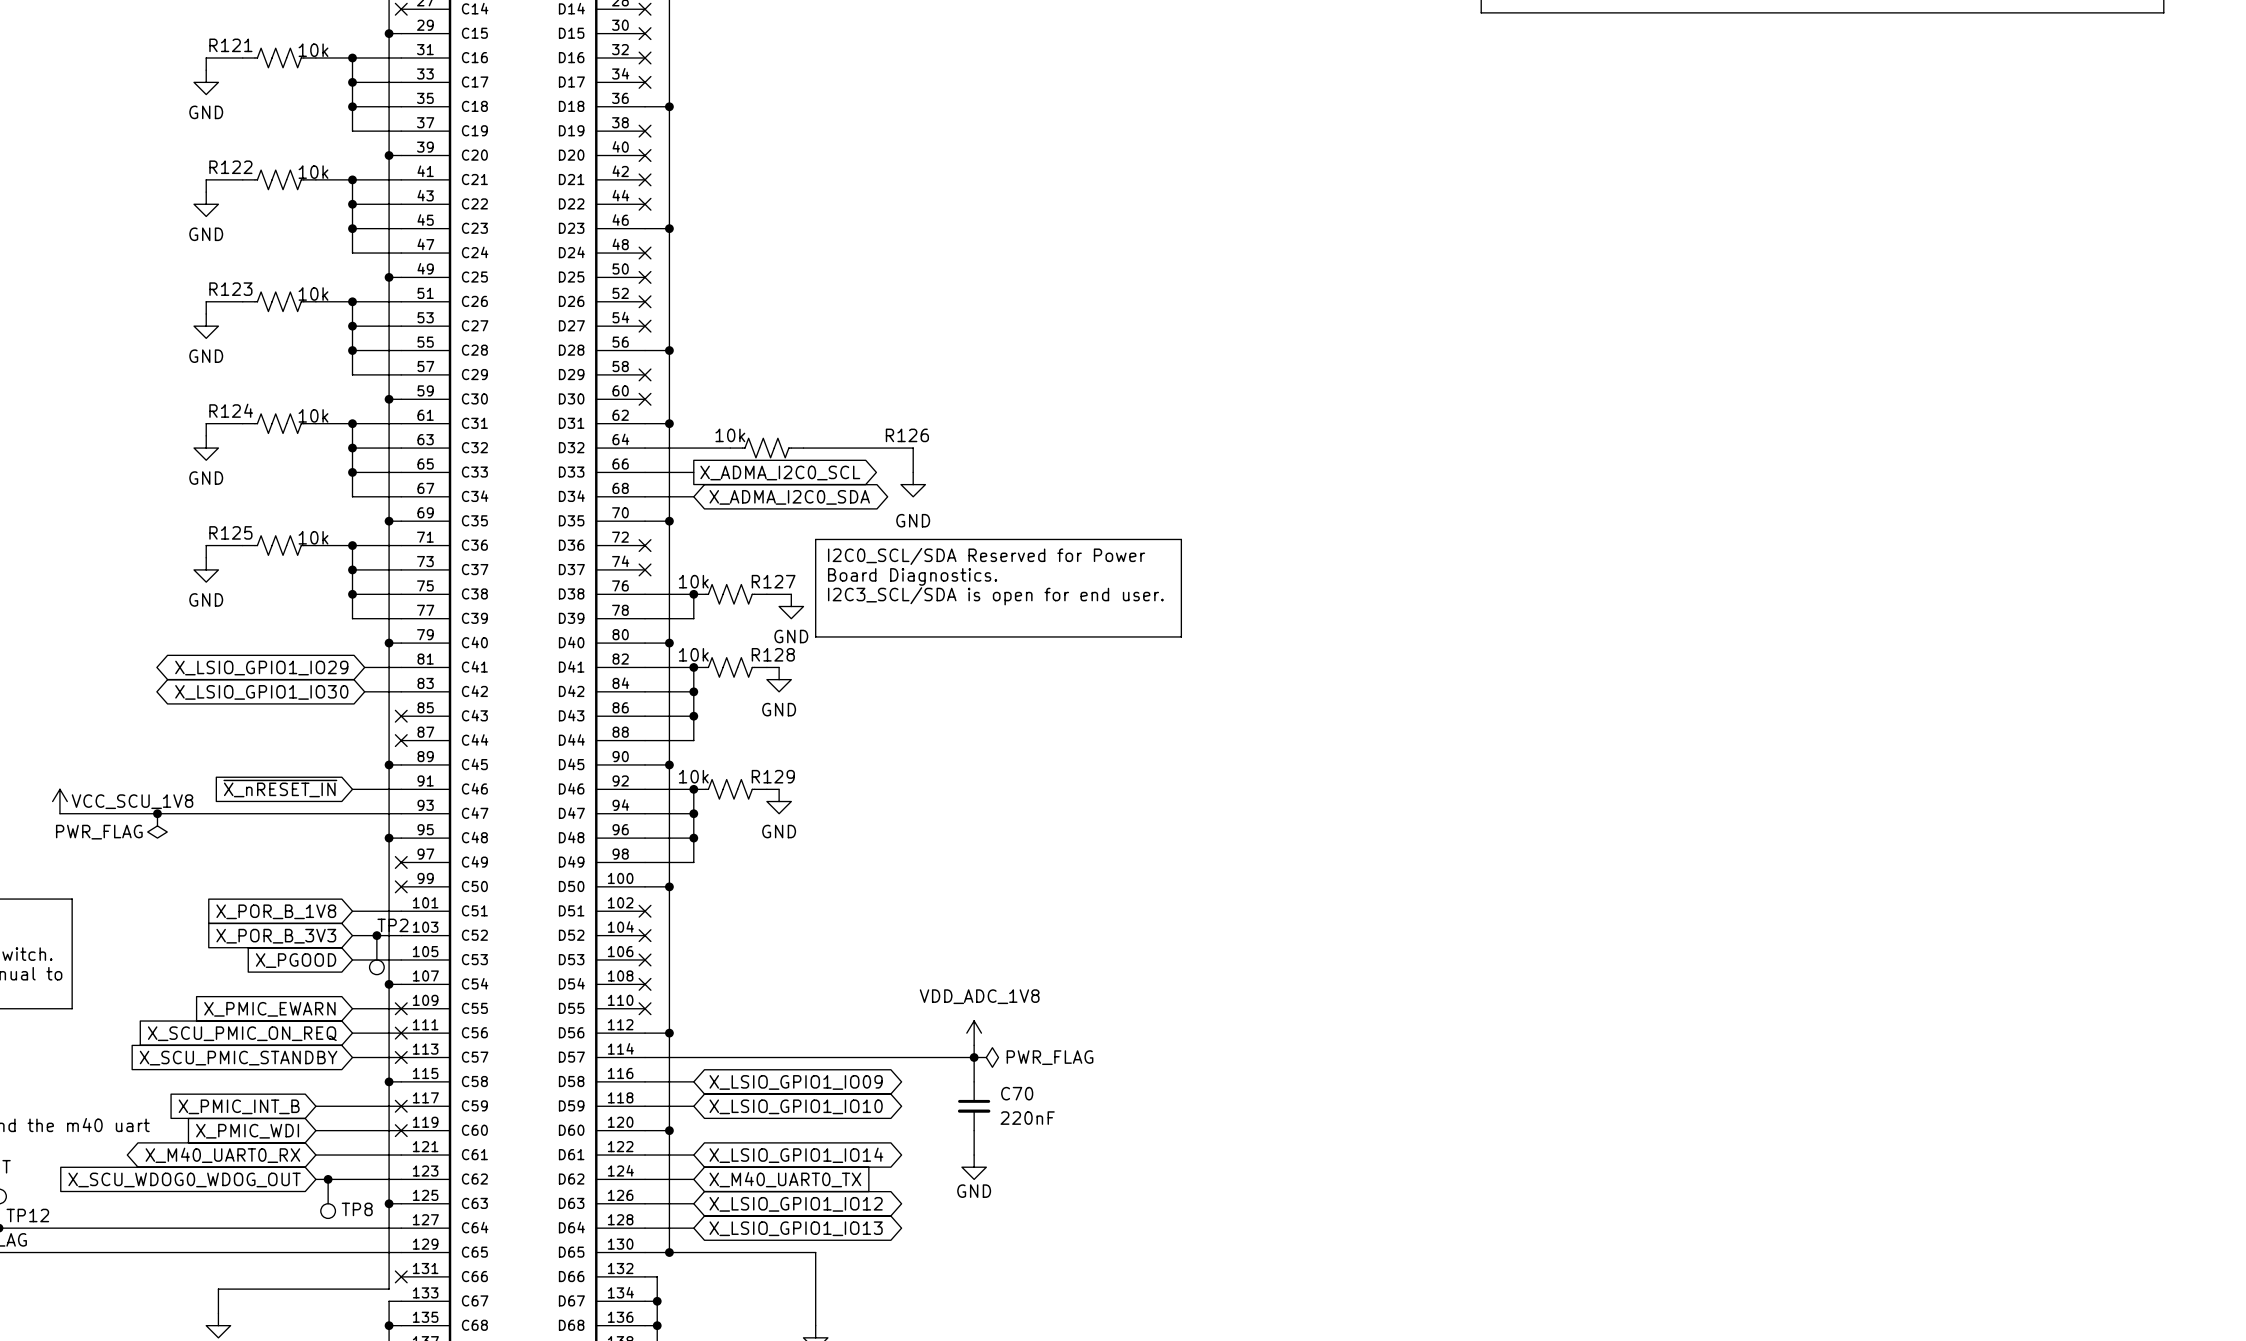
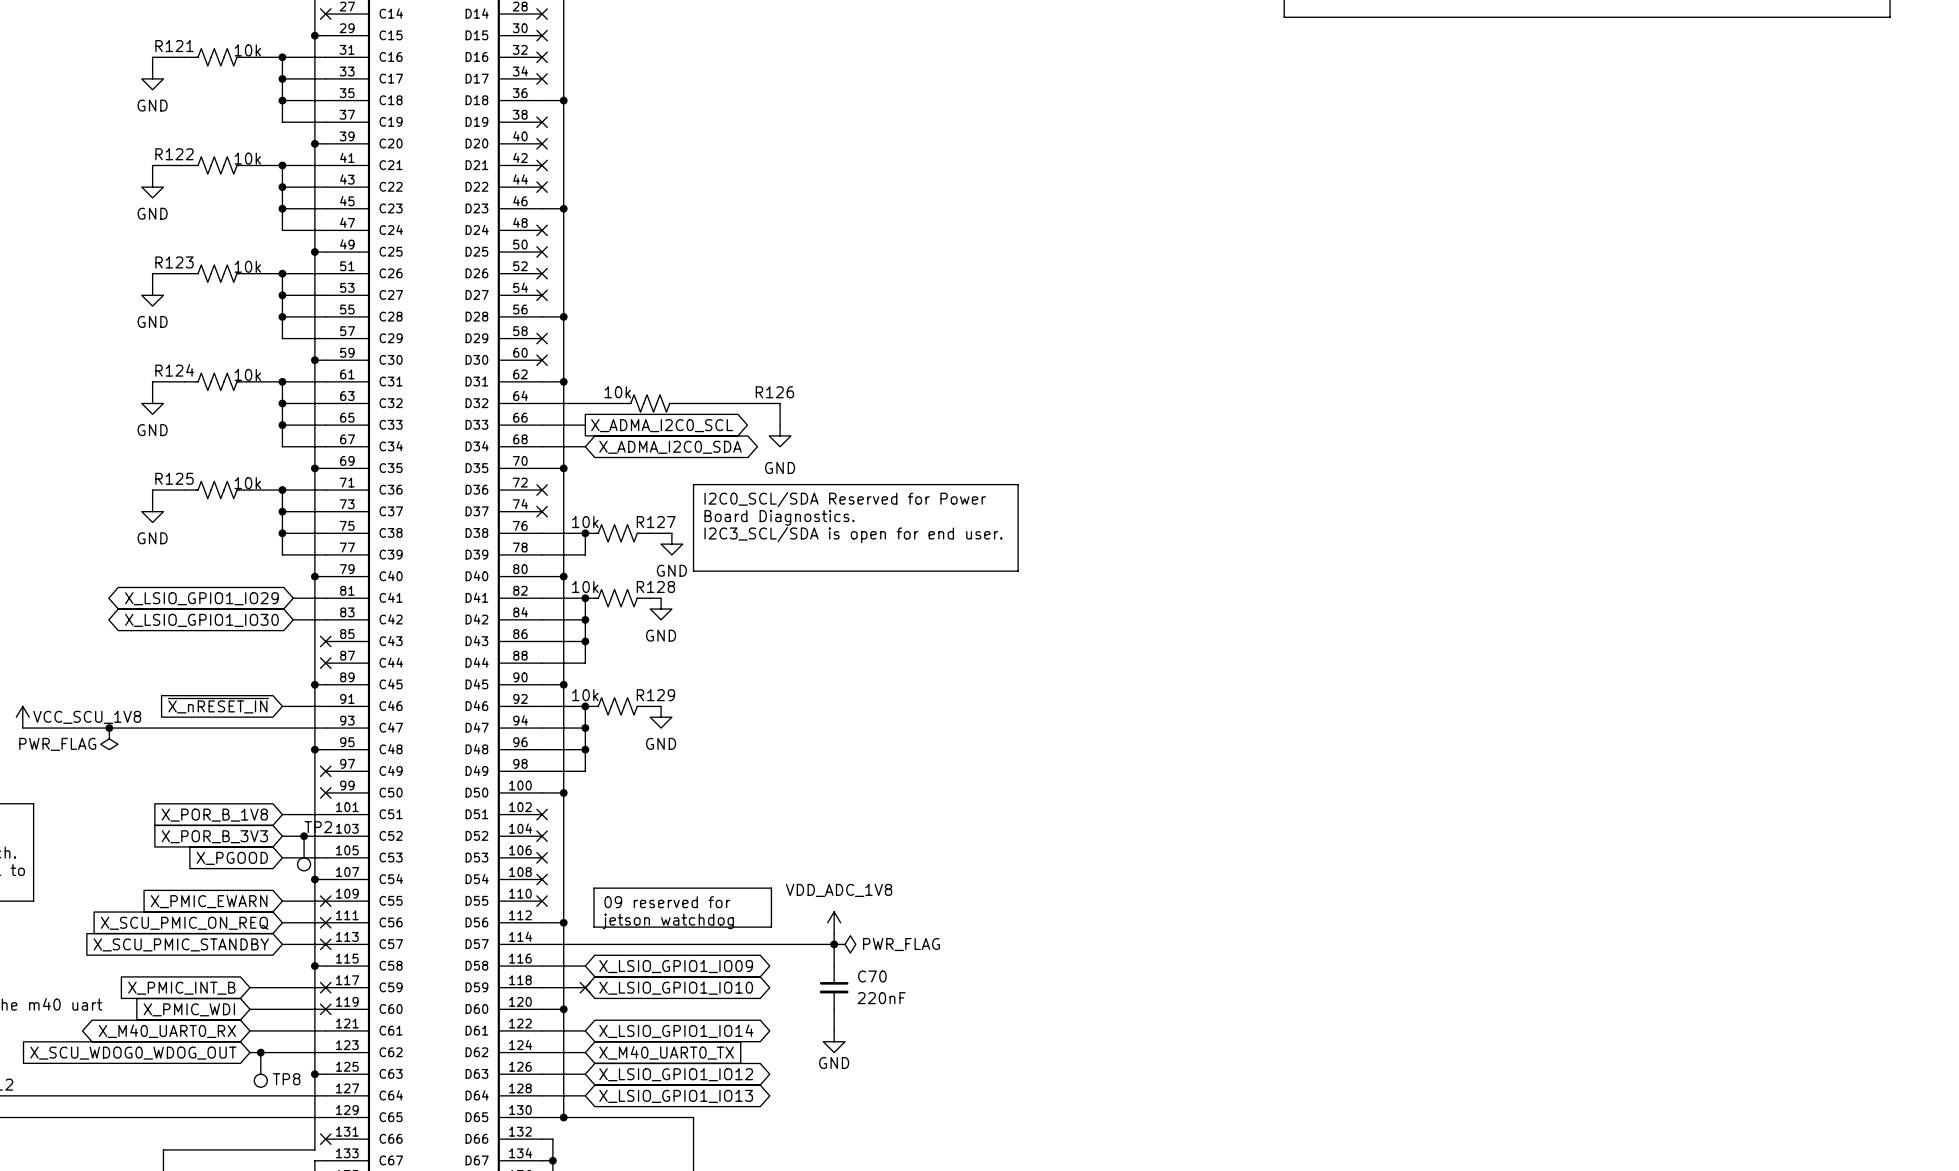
line: none -> (594, 888) (771, 888) (771, 927) (594, 927) (594, 888)
text: none -> 09 reserved for (667, 902)
text: none -> jetson watchdog (668, 921)
no-connect mark: none -> (585, 987)

